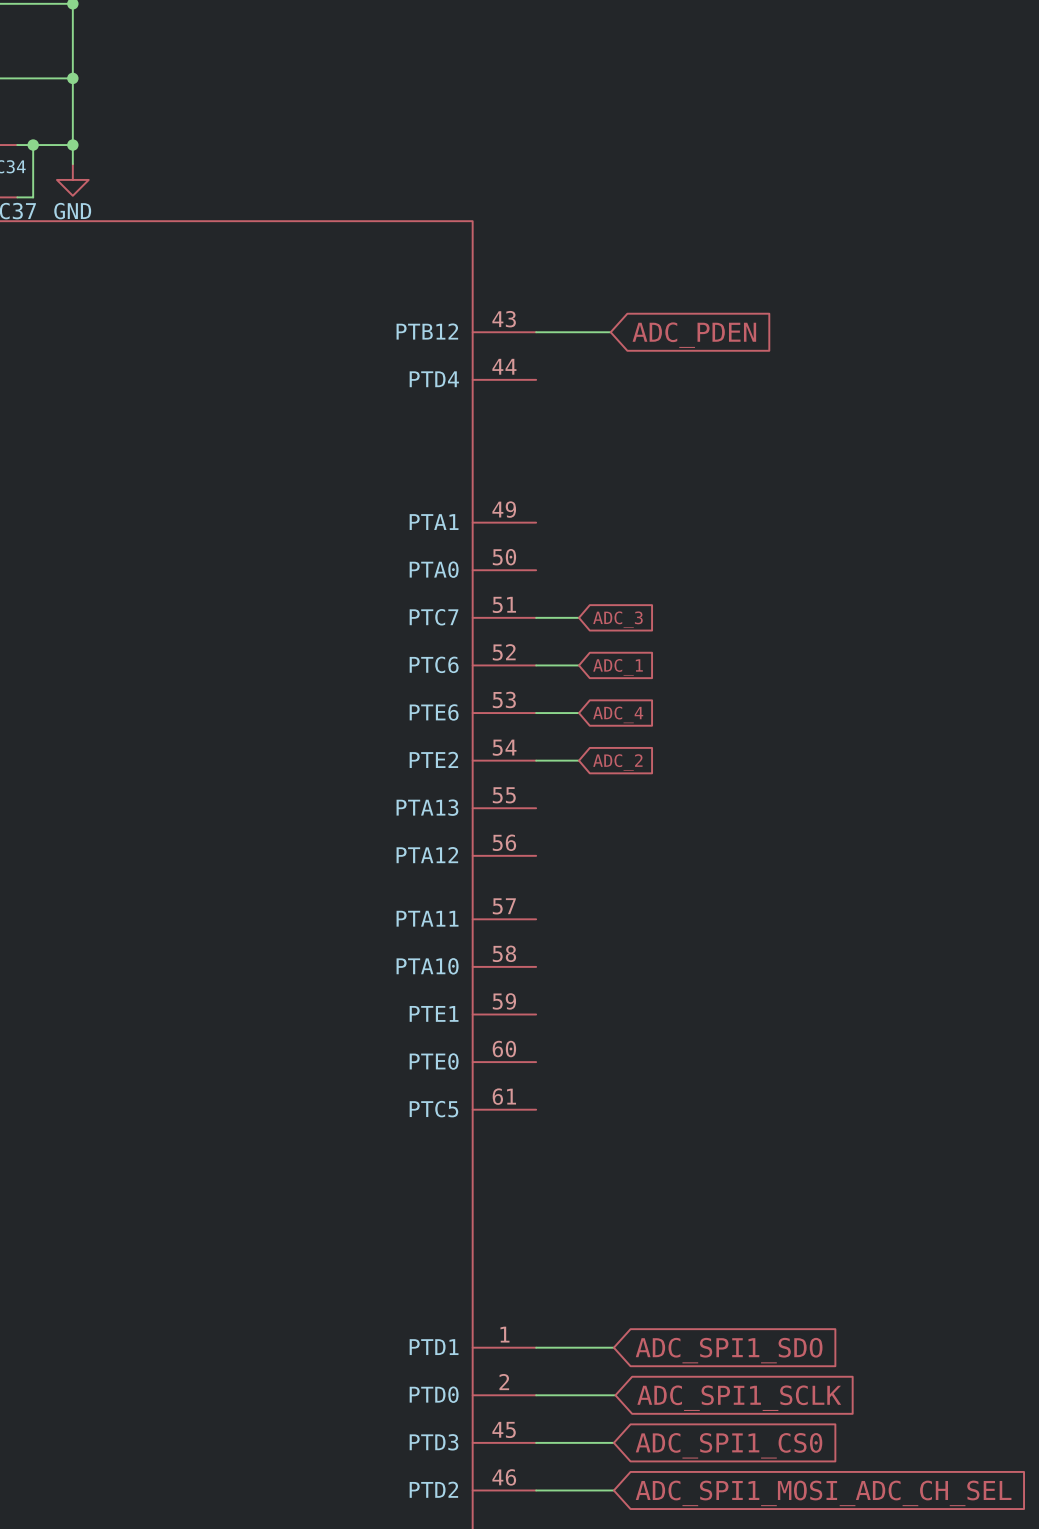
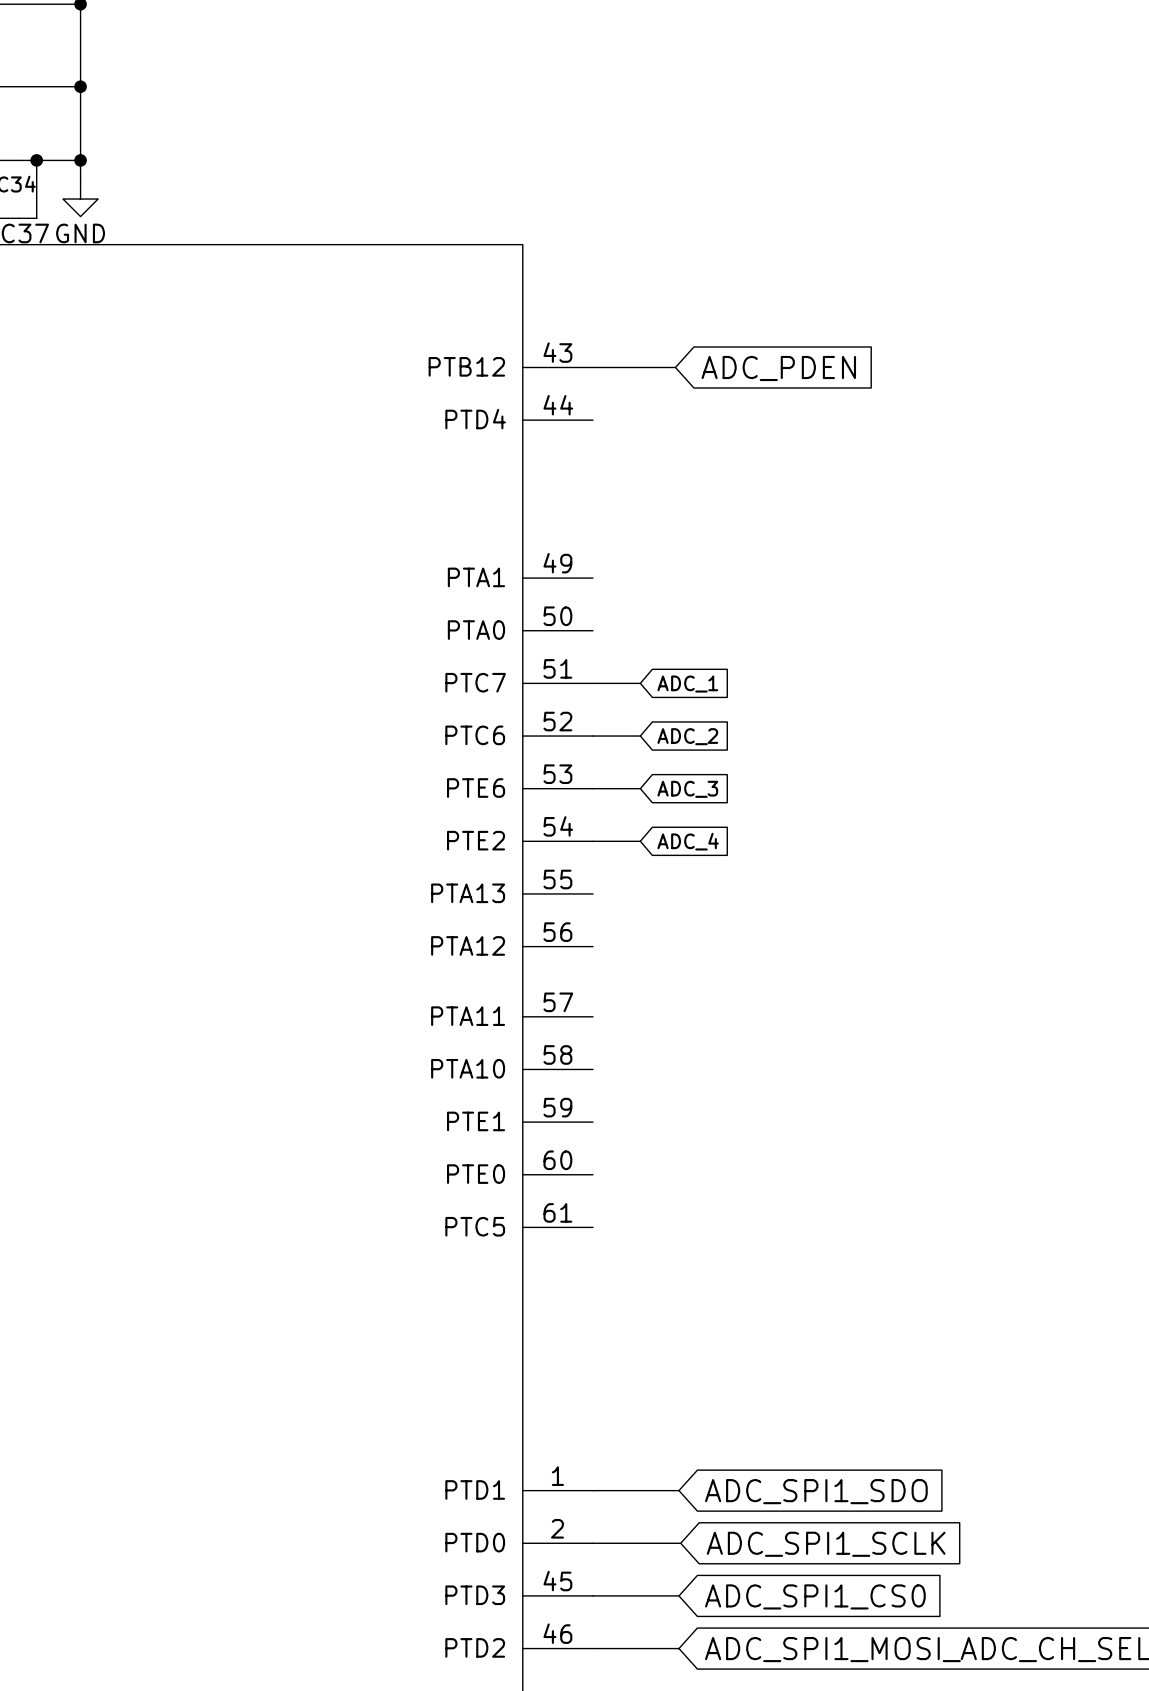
global label: ADC_3 (617, 619) -> ADC_1 (687, 684)
global label: ADC_1 (618, 667) -> ADC_2 (687, 736)
global label: ADC_4 (618, 714) -> ADC_3 (687, 789)
global label: ADC_2 (617, 762) -> ADC_4 (688, 841)

